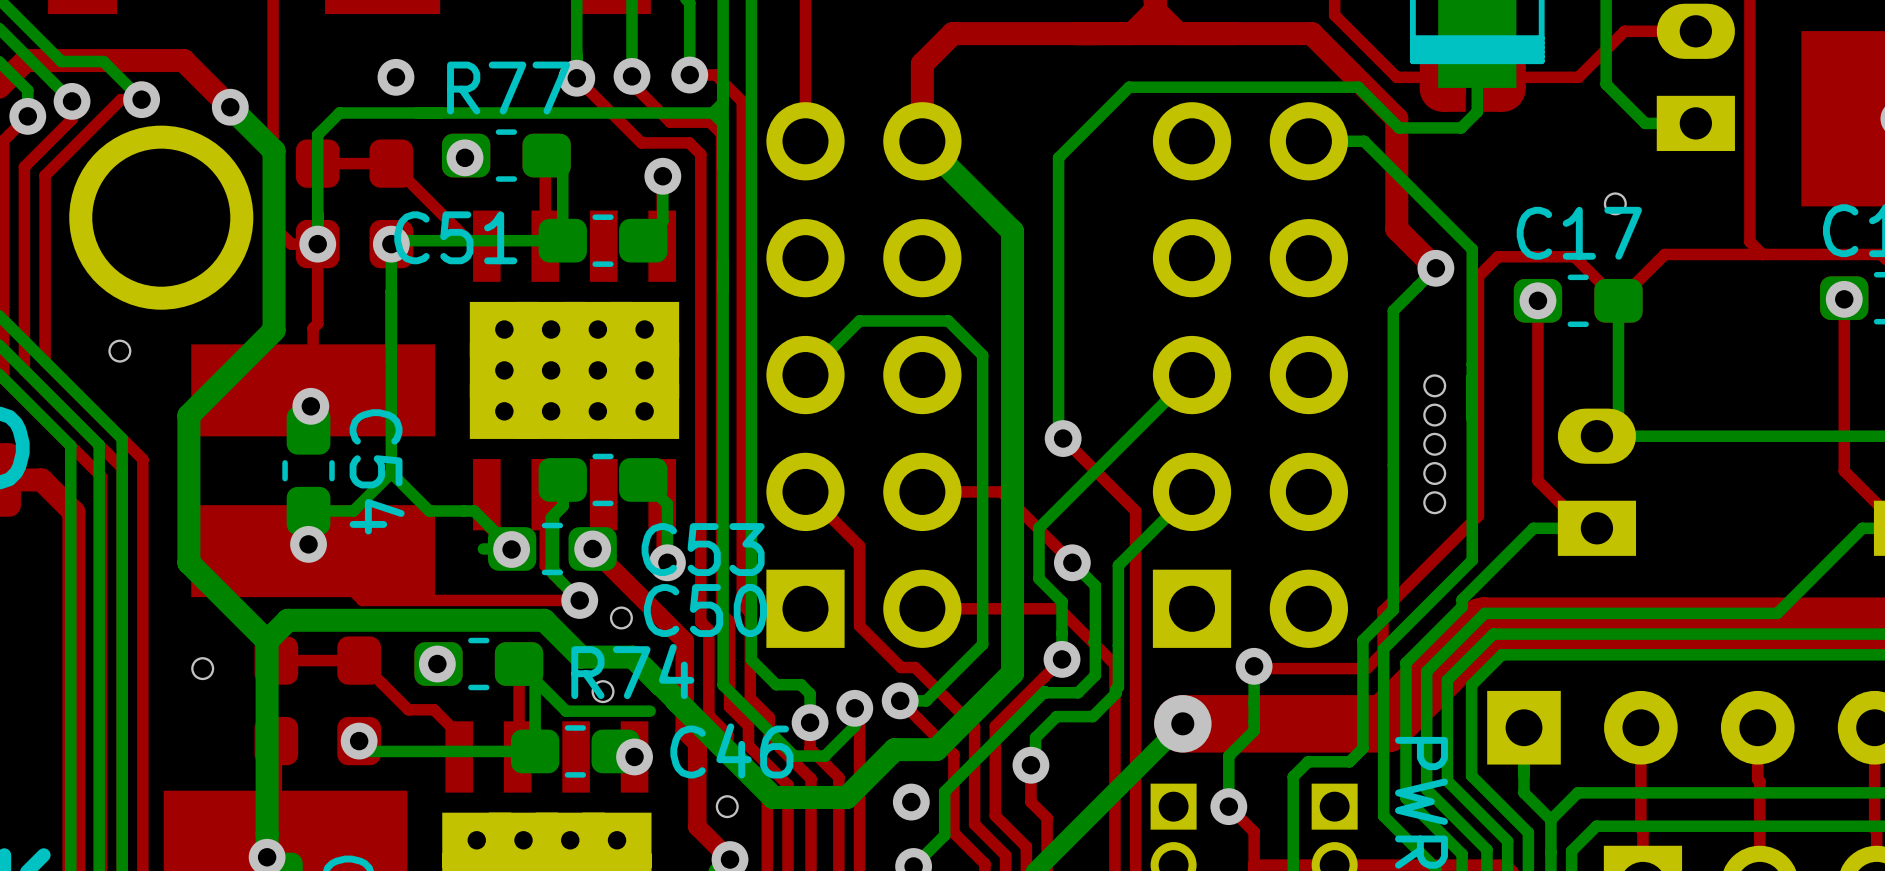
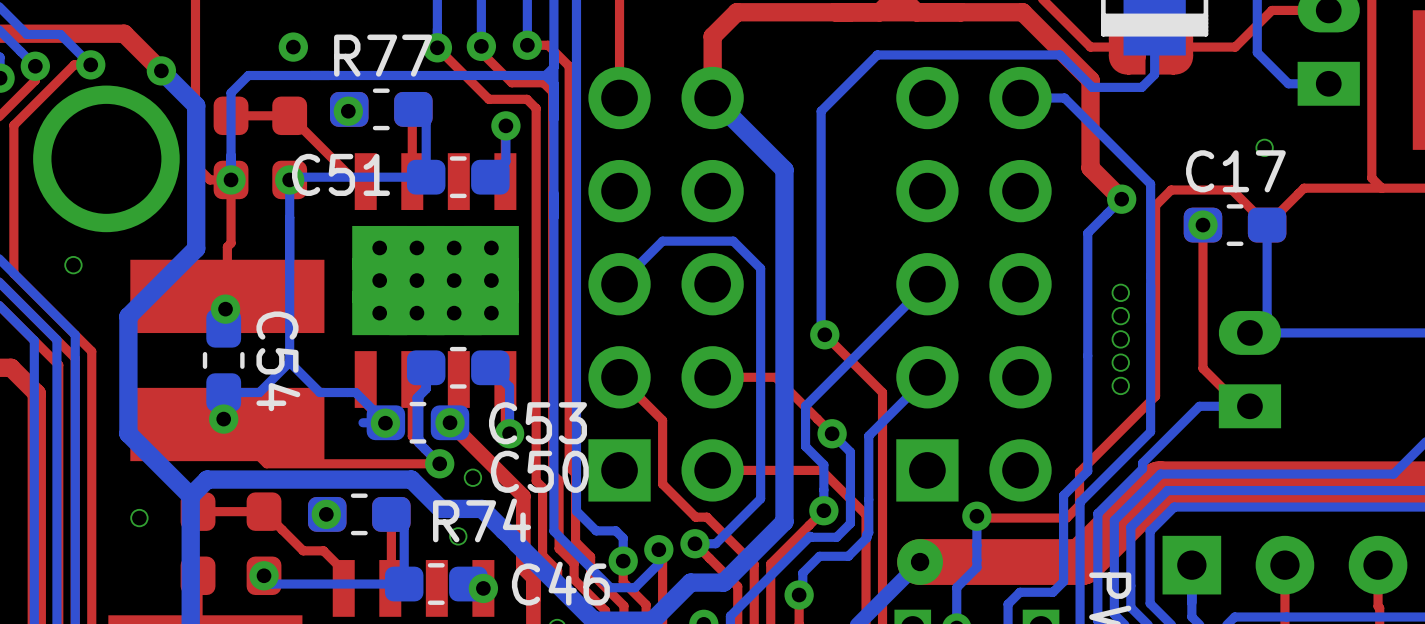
bottom track: (535, 680) (566, 711) (650, 711) -> none

